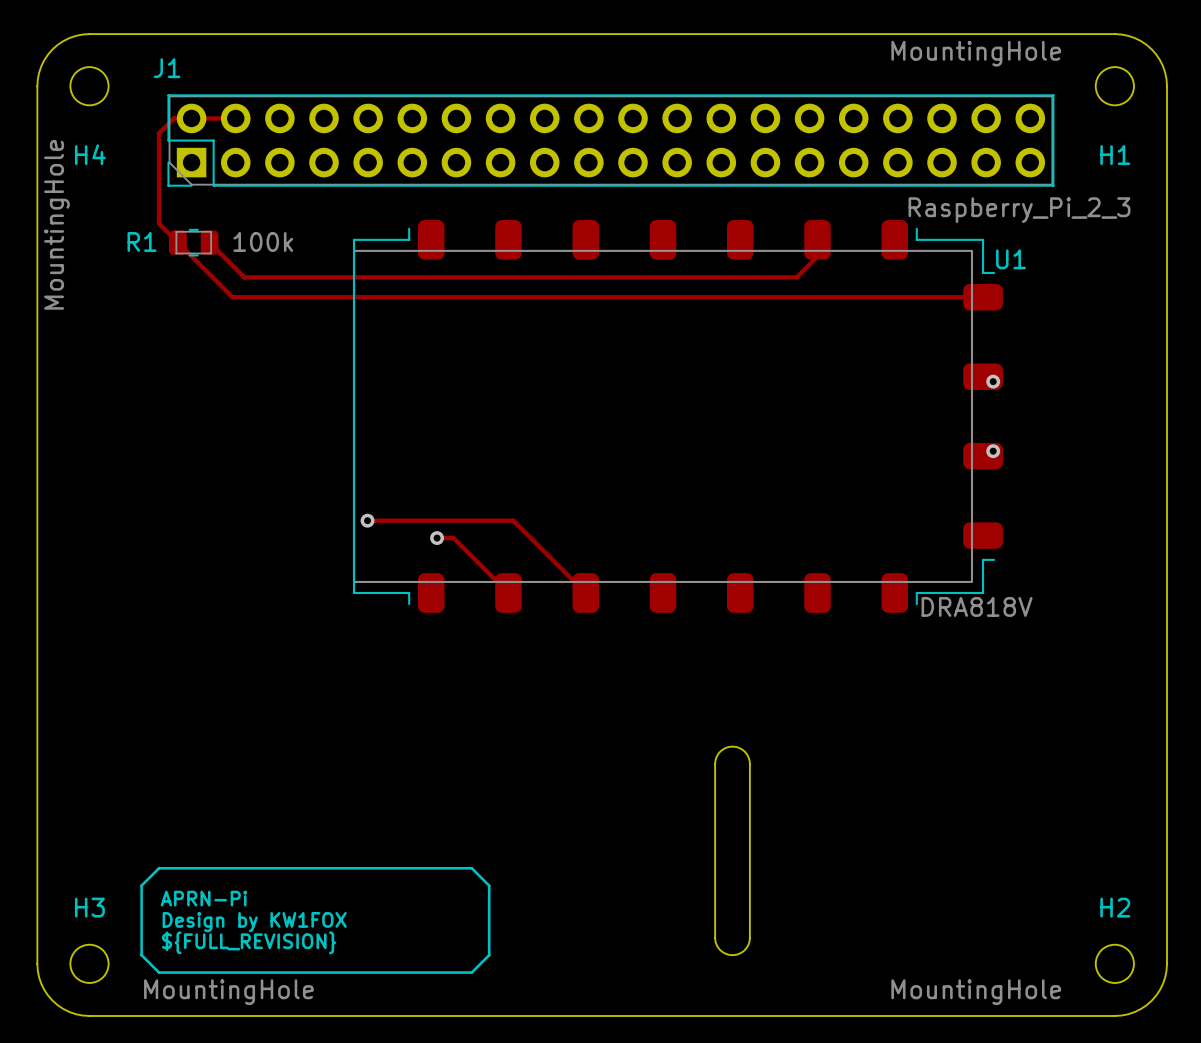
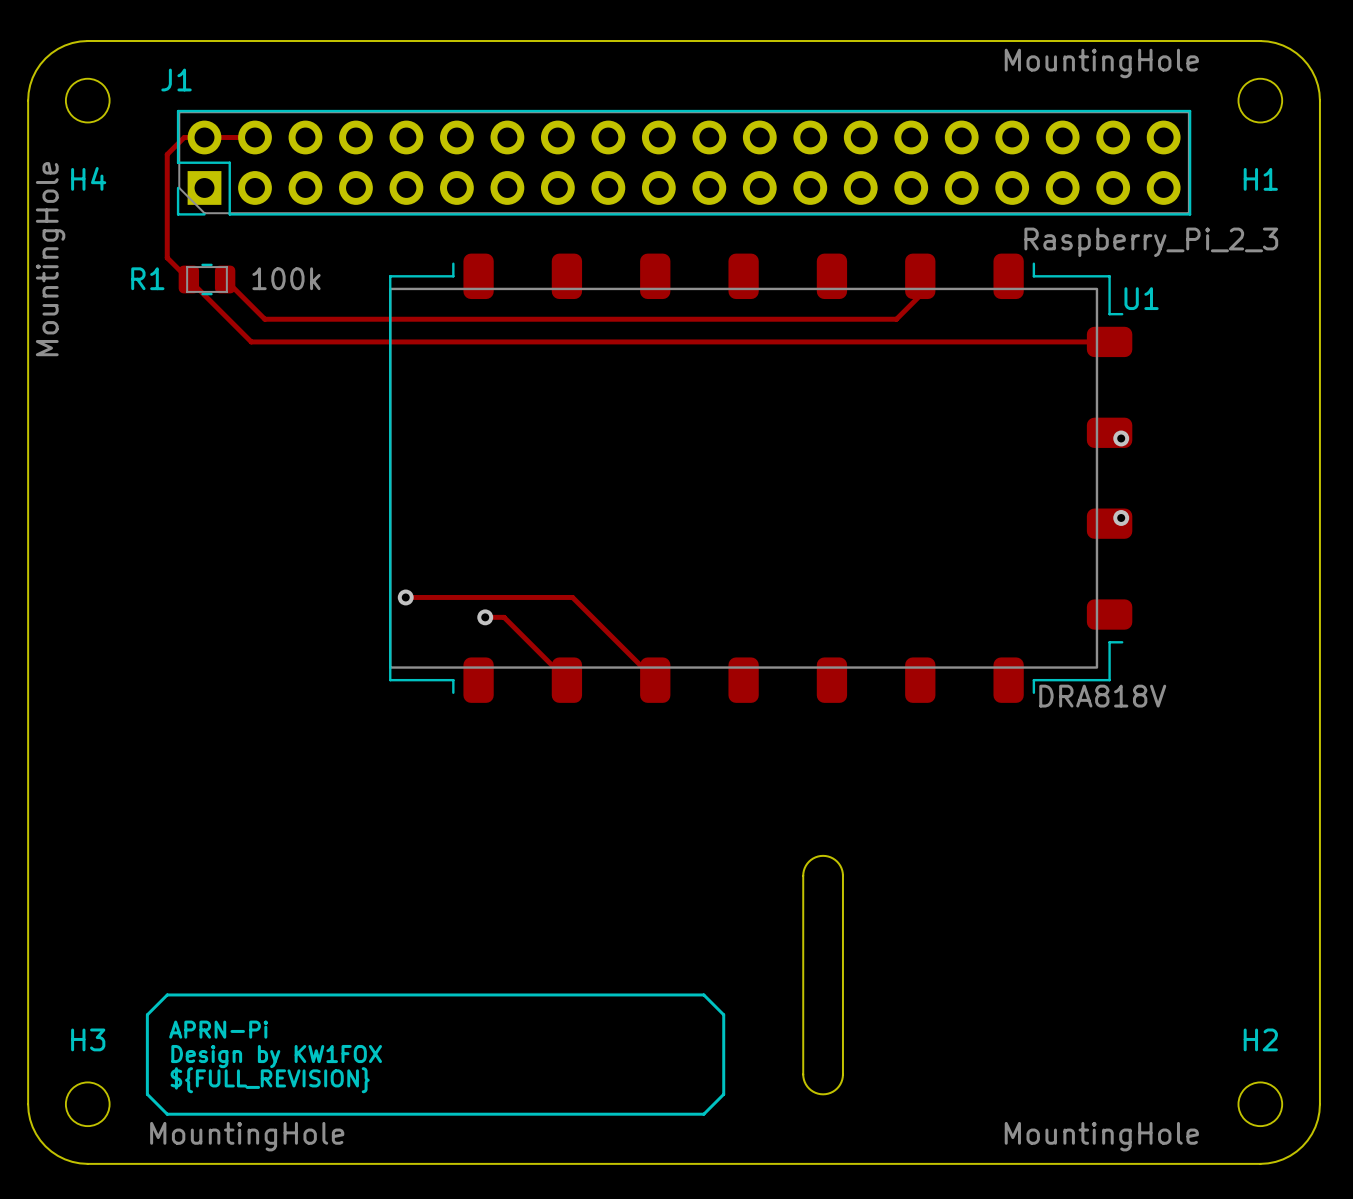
line: (471, 868) (489, 885) (489, 955) (471, 972) -> (524, 994) (703, 994) (723, 1014) (723, 1094) (703, 1114) (524, 1114)

